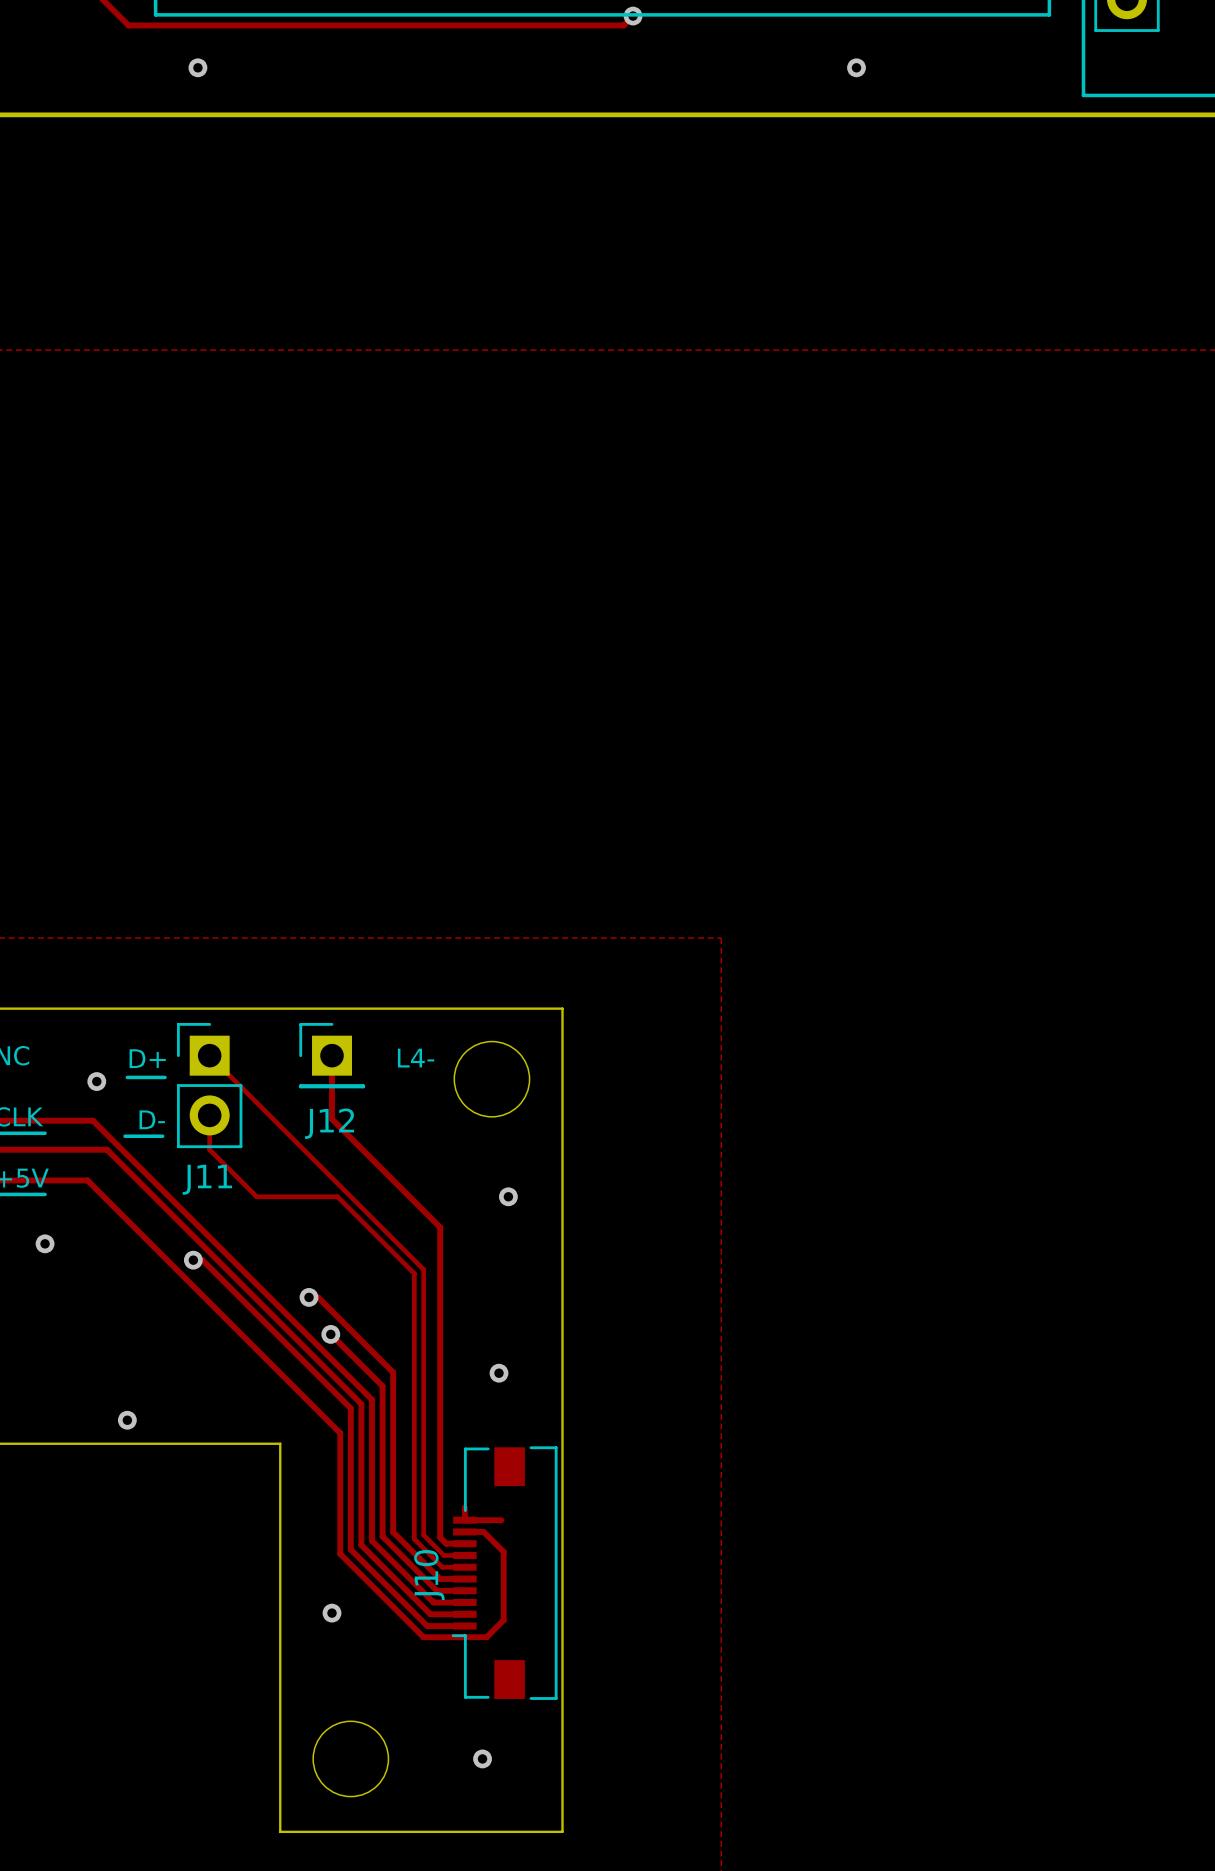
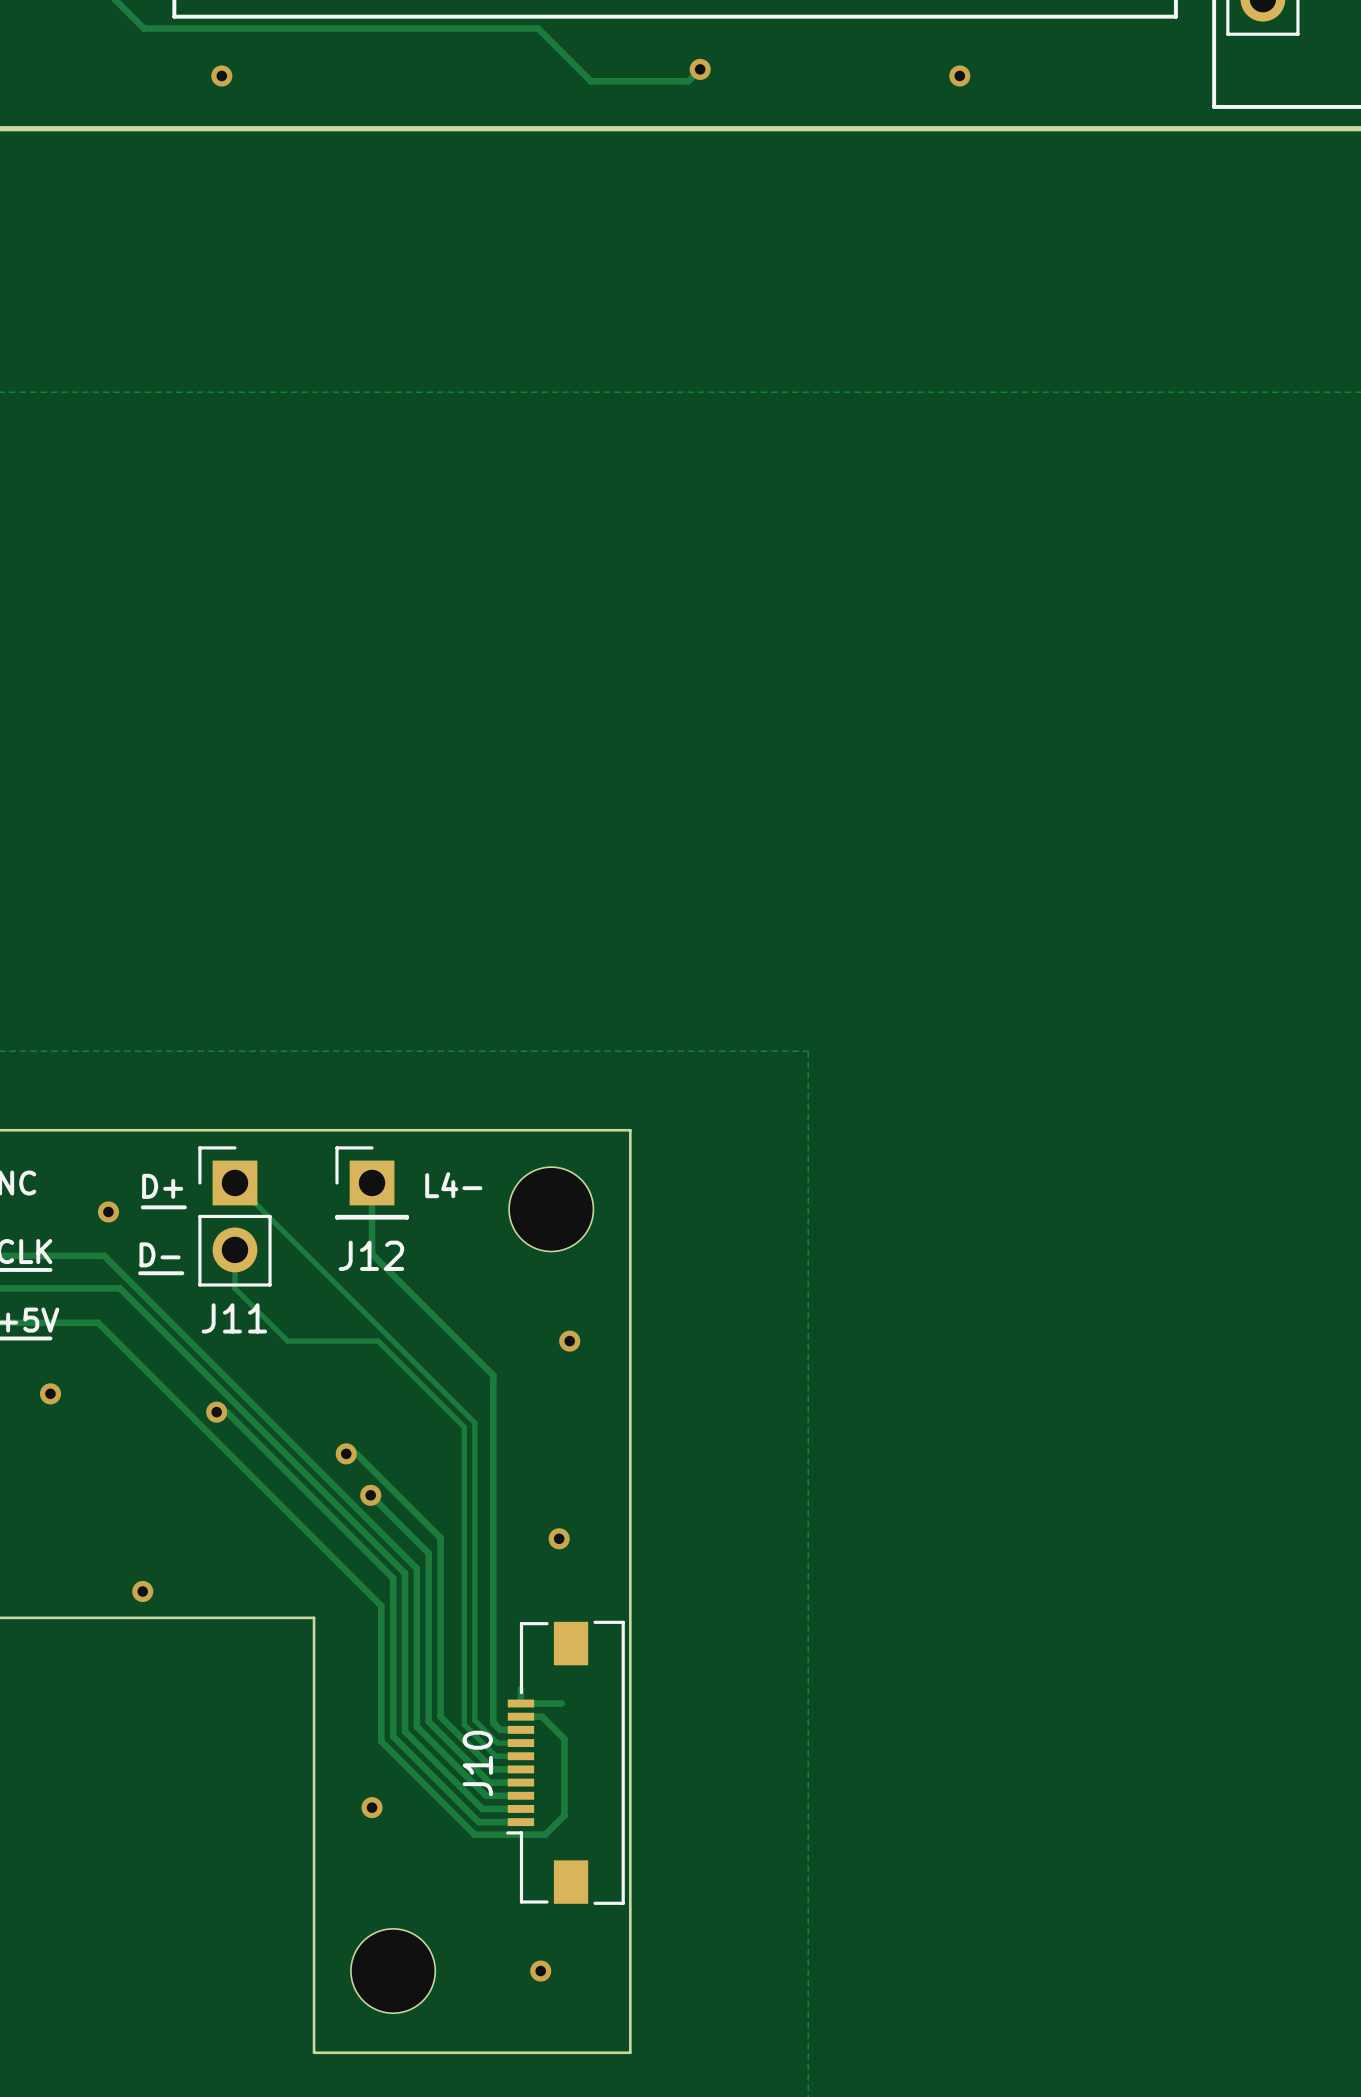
track: (633, 16) (623, 25) (480, 25) -> (700, 69) (688, 81) (590, 81) (538, 28)
via: (633, 16) -> none
via: none -> (700, 69)

